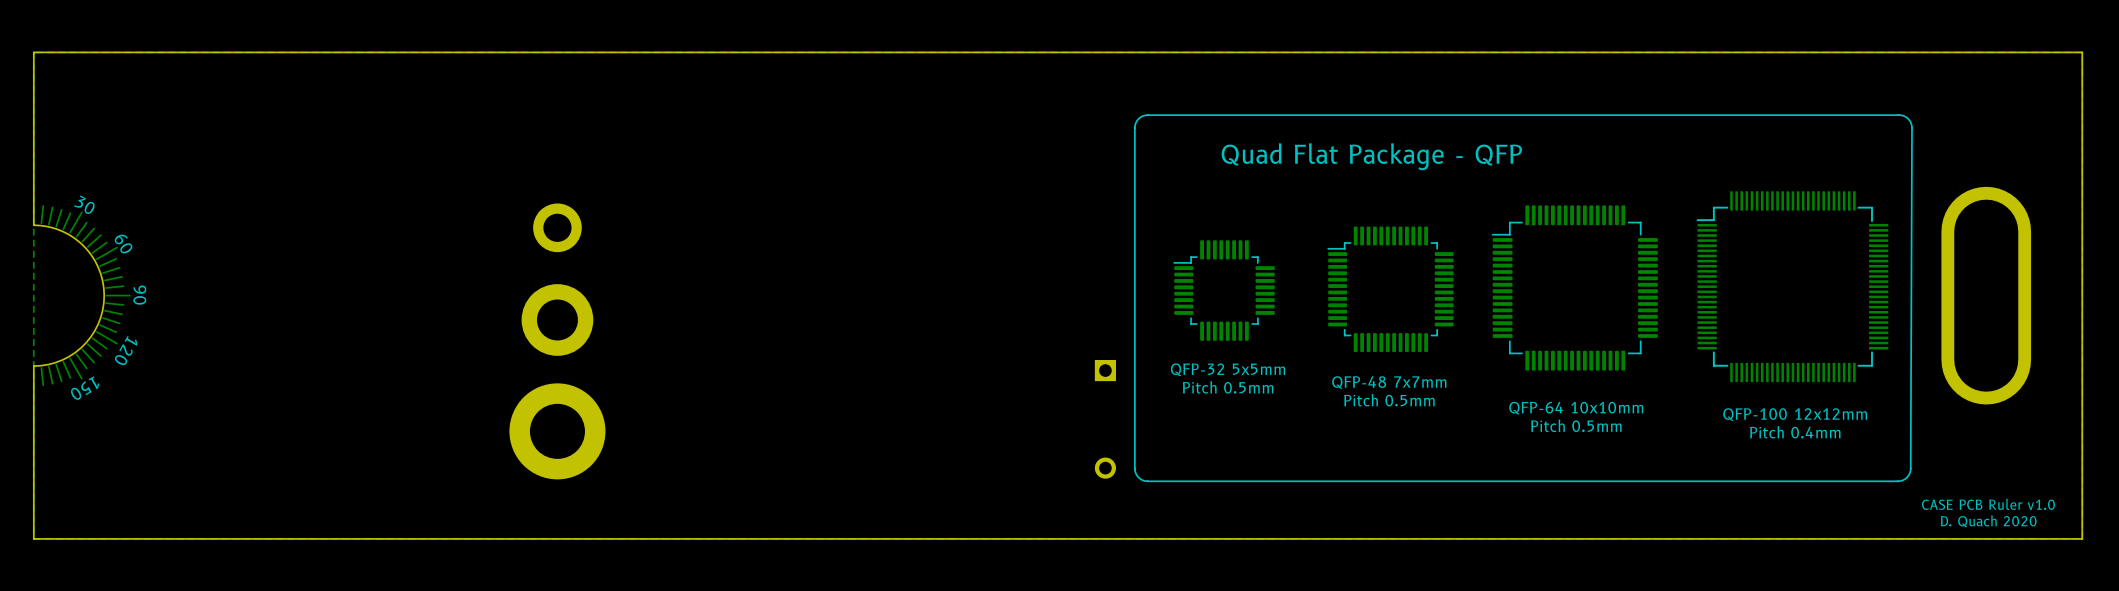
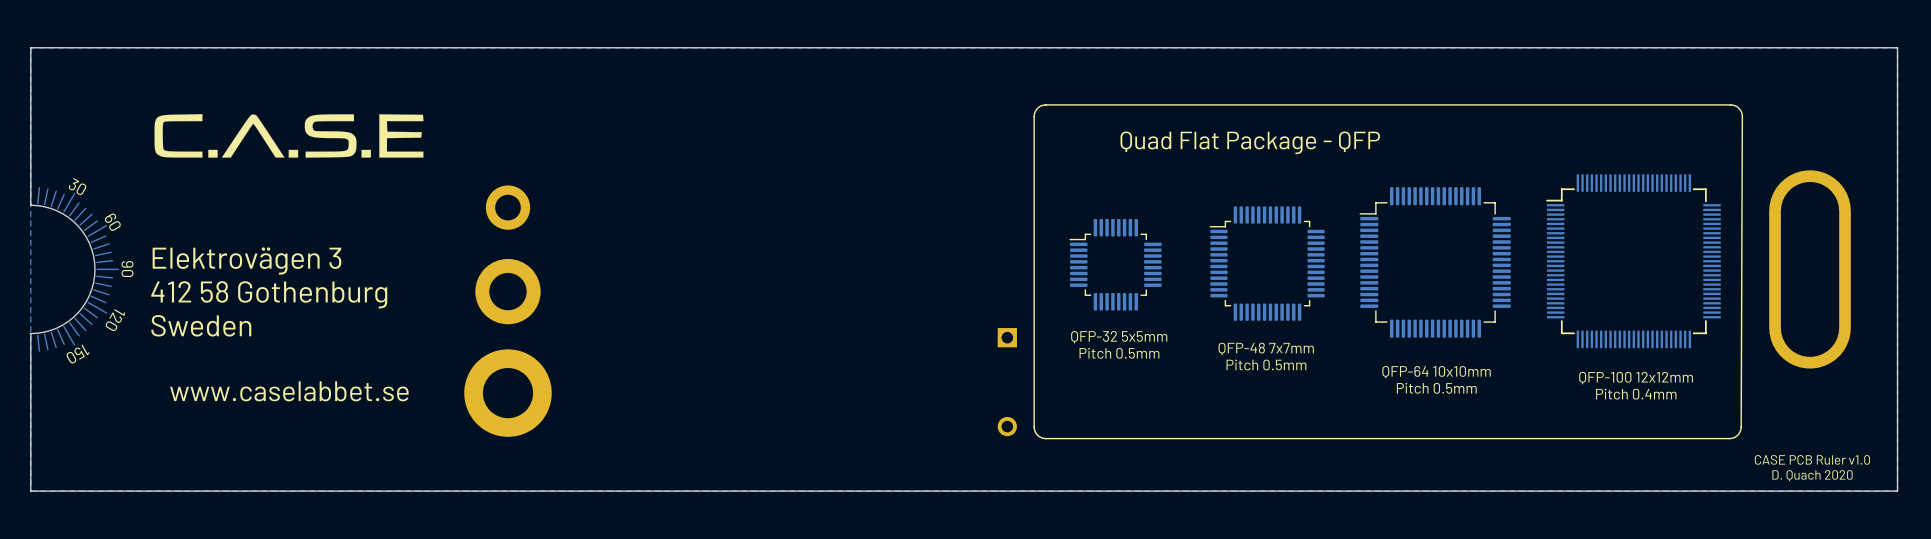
drawing: none -> [154, 114, 424, 158]
text: none -> Elektrovägen 3 (246, 261)
text: none -> 412 58 Gothenburg (269, 294)
text: none -> Sweden (201, 325)
text: none -> www.caselabbet.se (289, 391)

